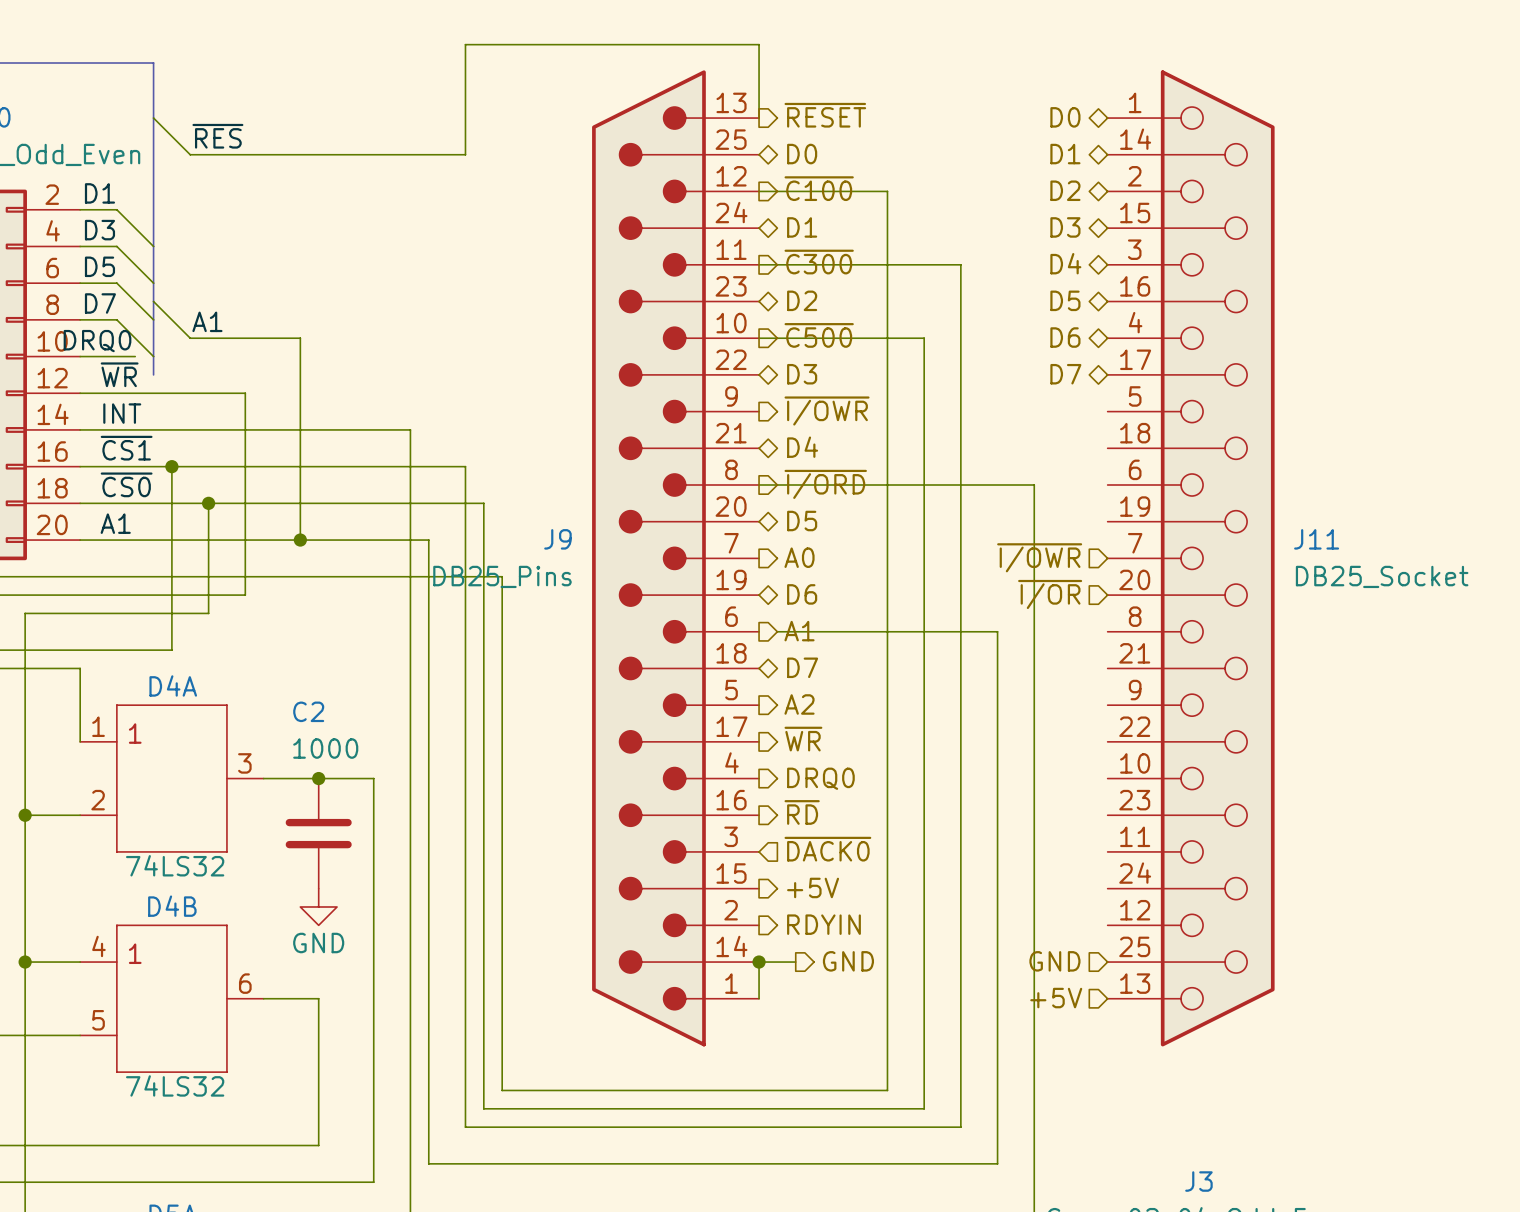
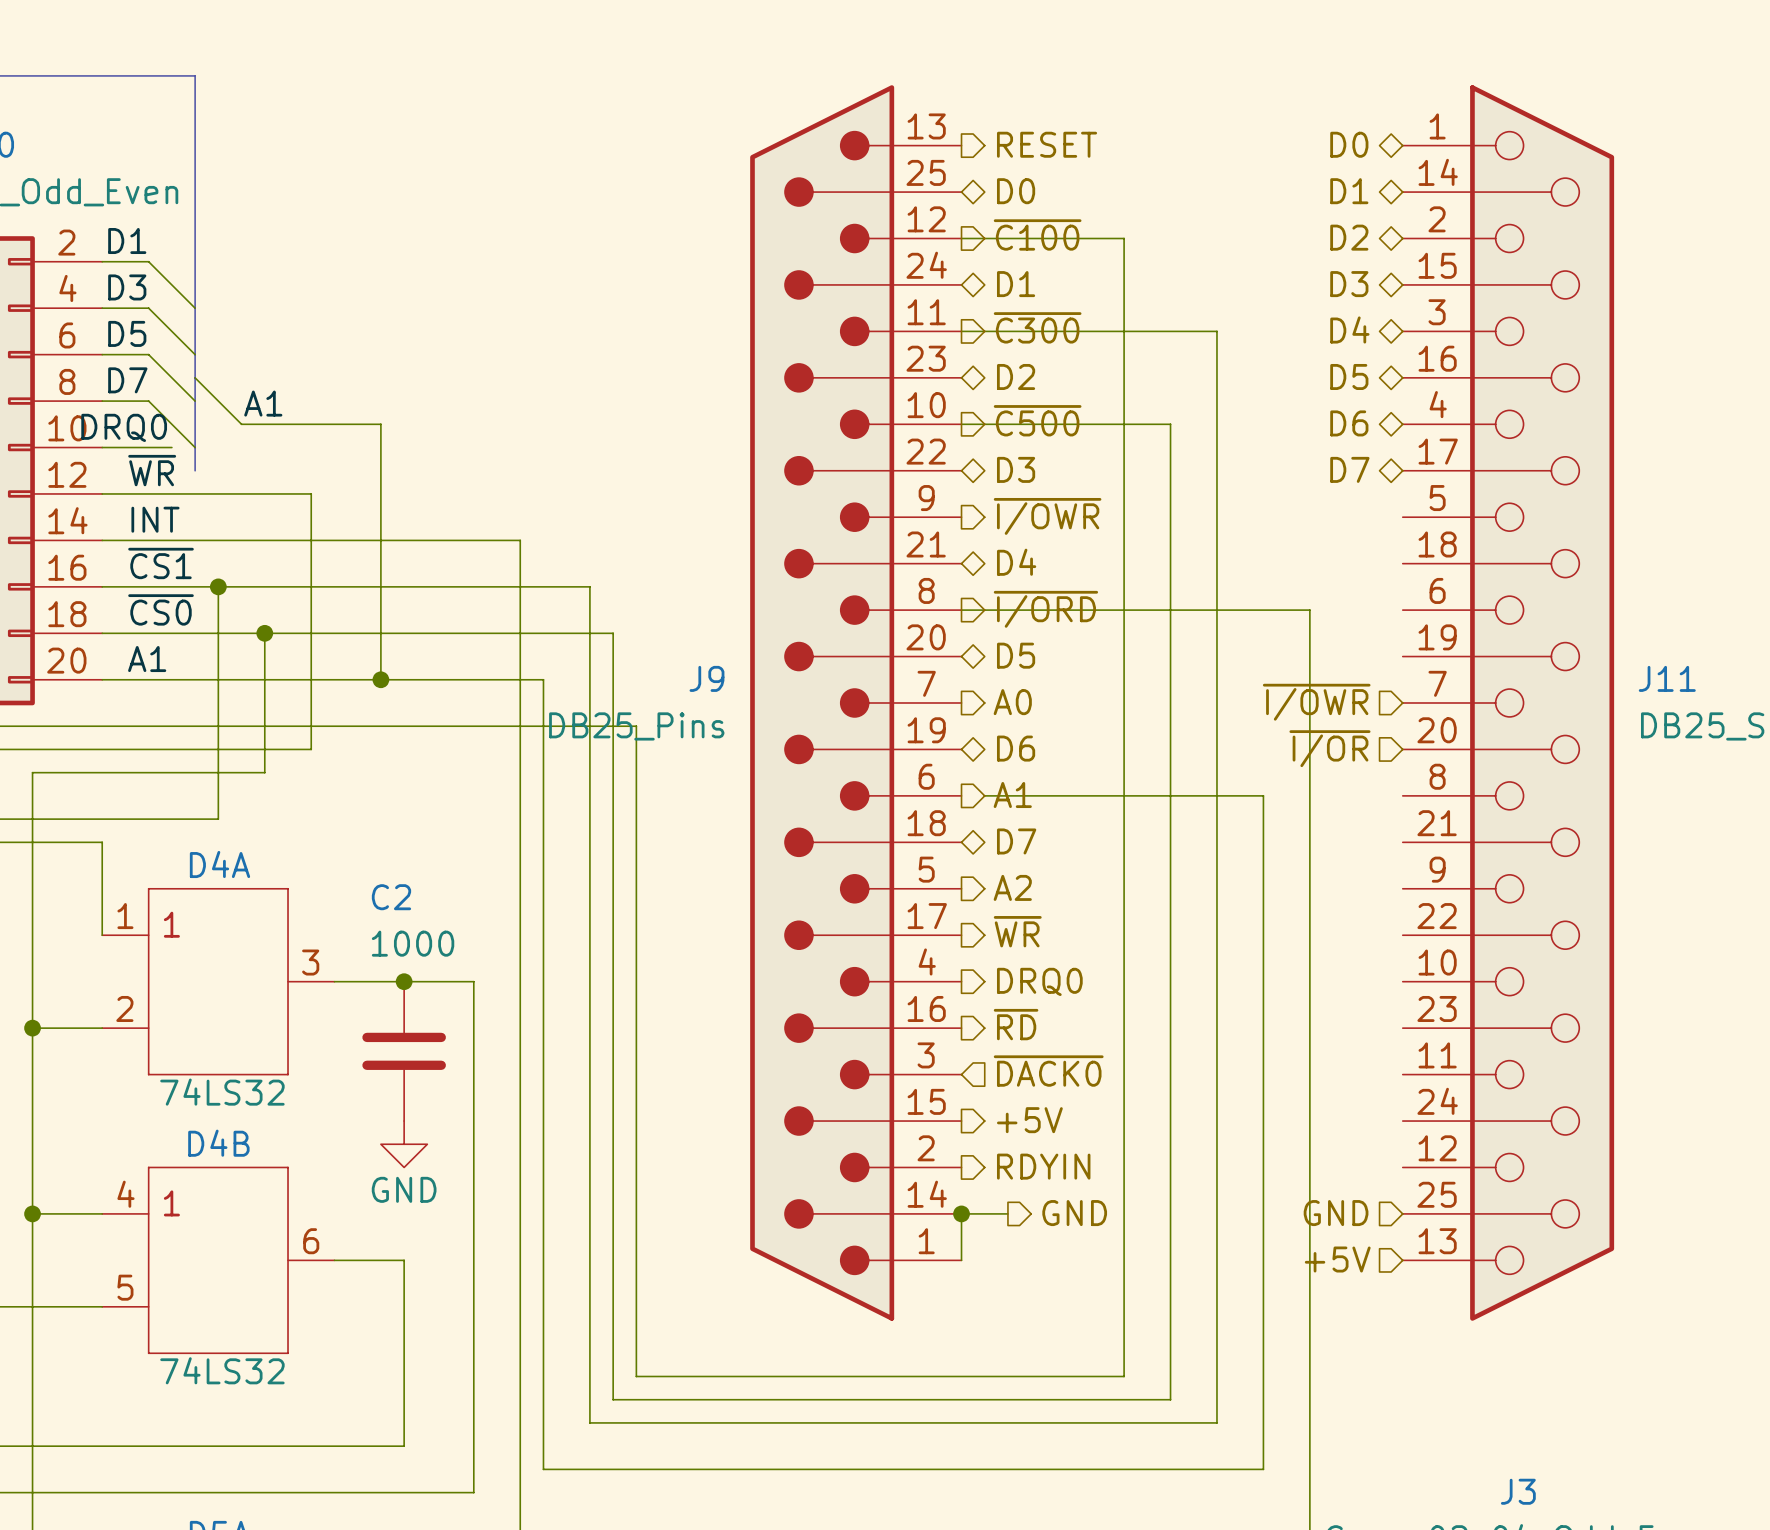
hierarchical label: ~{RESET} (825, 115) -> RESET (1047, 144)
wire: (153, 118) (190, 154) (465, 154) (465, 44) (759, 44) (759, 118) -> none
label: ~{RES} (217, 136) -> none

